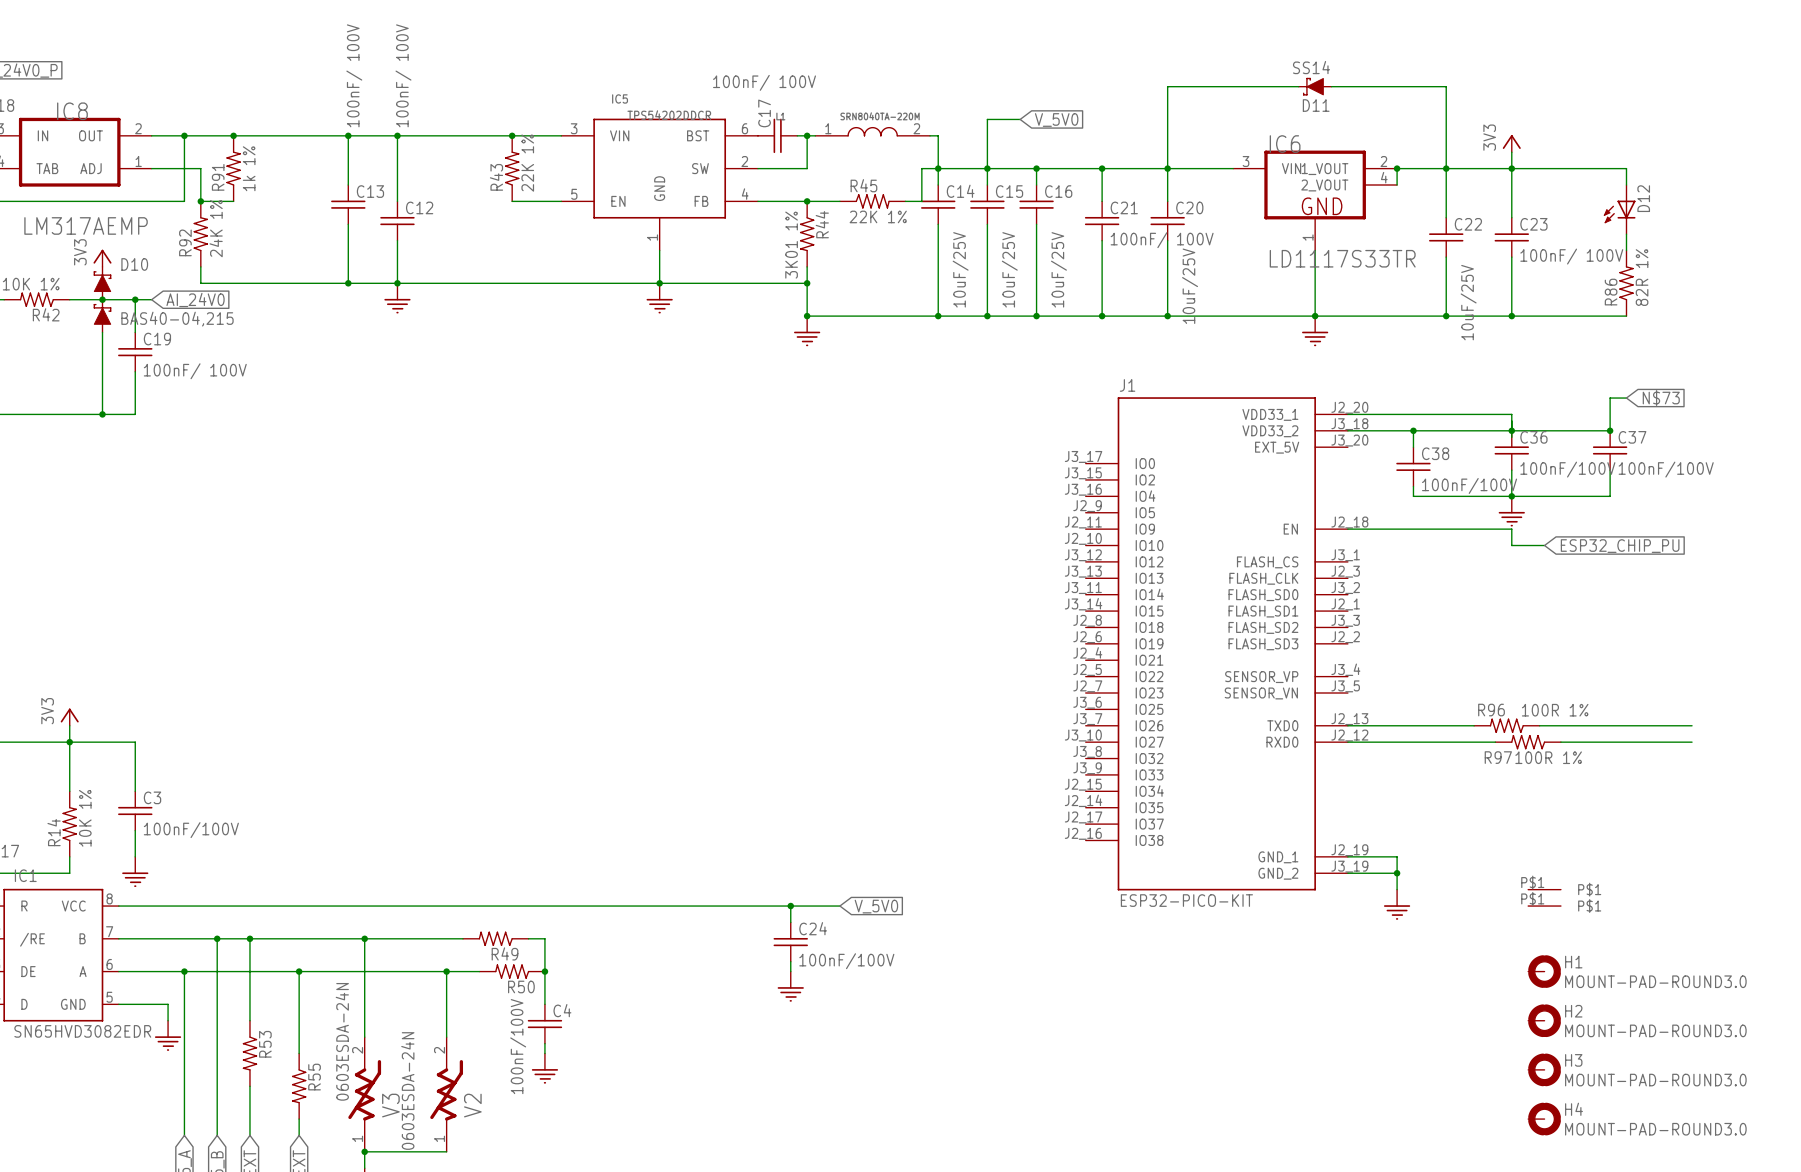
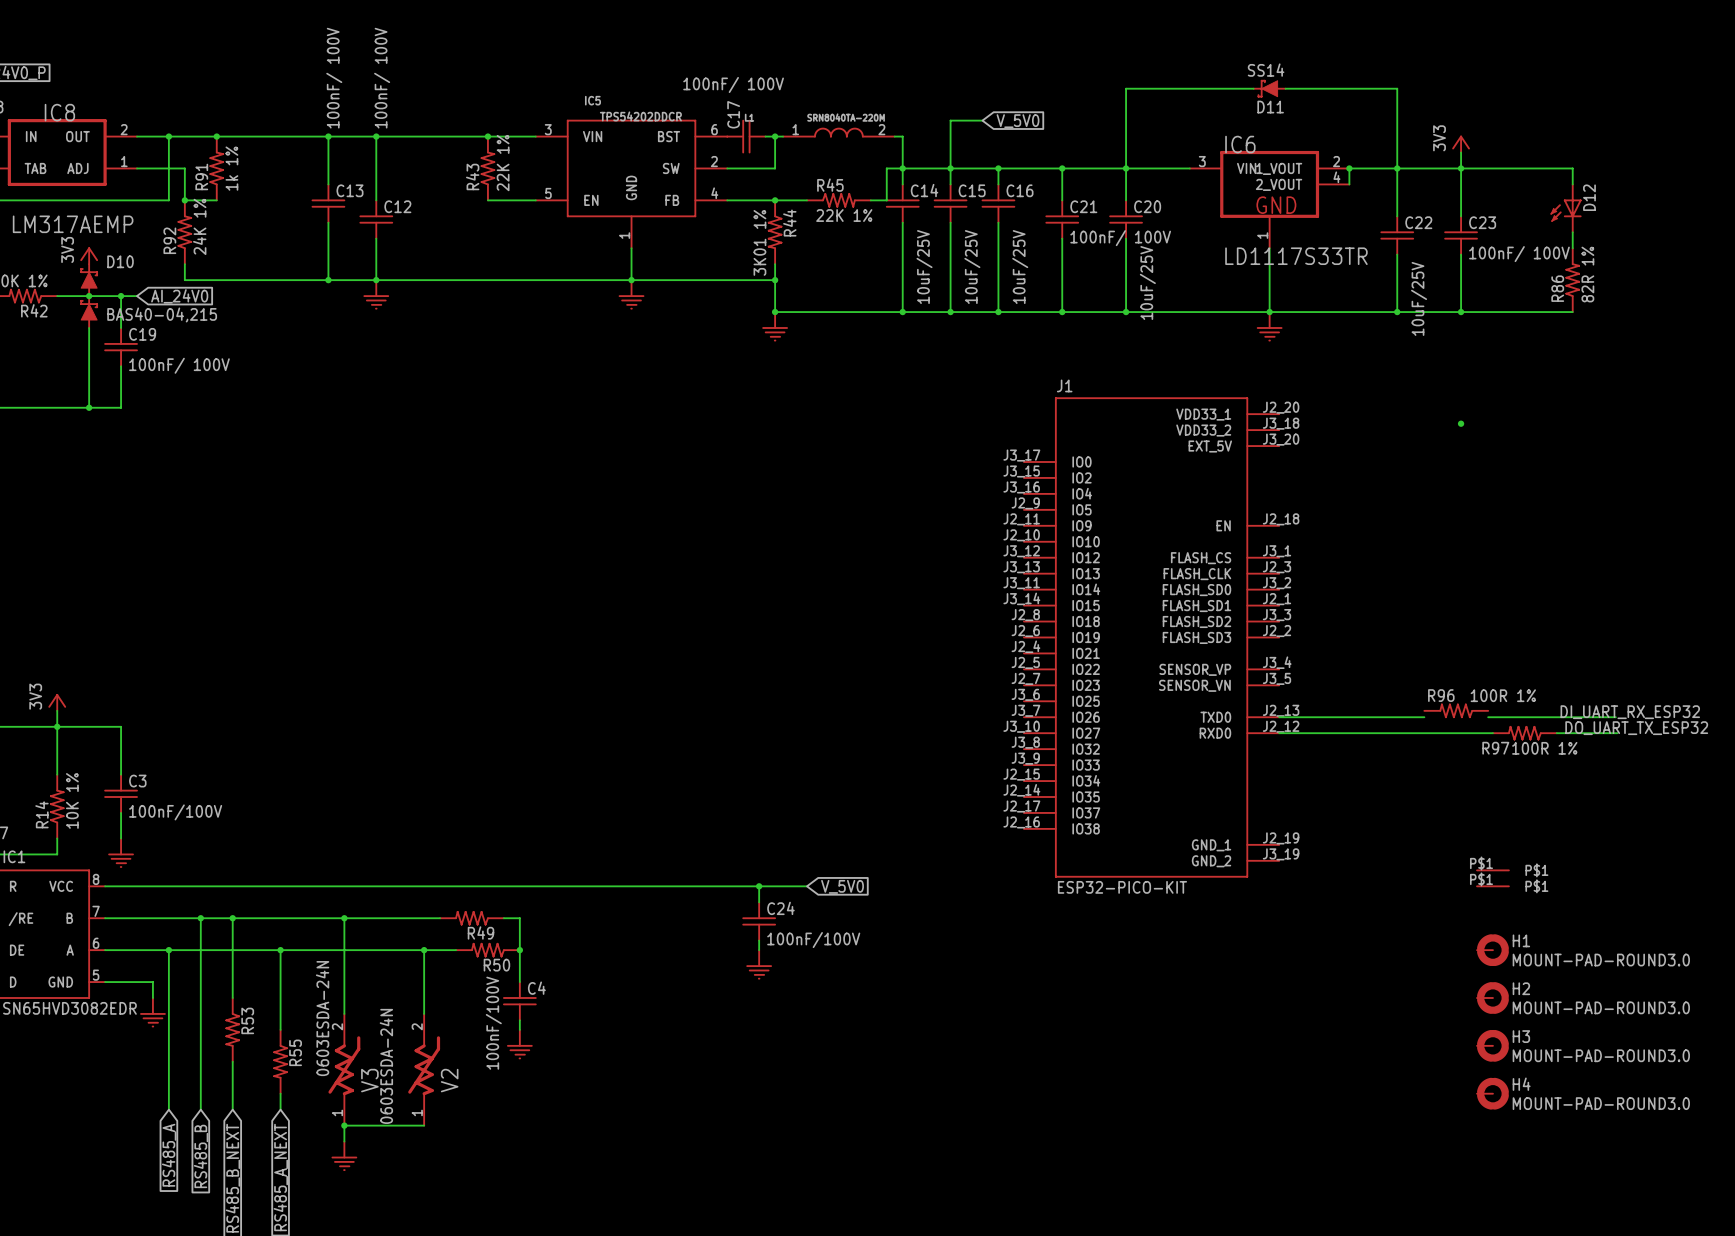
wire: (1626, 398) (1610, 398) (1610, 430) (1347, 430) -> none
global label: N$73 (1661, 398) -> none
wire: (1347, 414) (1511, 414) (1511, 437) -> none
wire: (1413, 430) (1413, 447) -> none
junction: (1413, 430) -> none
junction: (1610, 430) -> none
C36: 100nF/100V (1511, 450) -> none
C37: 100nF/100V (1610, 450) -> none
C38: 100nF/100V (1413, 466) -> none
wire: (1511, 470) (1511, 496) -> none
wire: (1610, 470) (1610, 496) (1413, 496) (1413, 486) -> none
junction: (1511, 496) -> none
power symbol: (1511, 511) -> none
wire: (1347, 529) (1511, 529) (1511, 545) (1544, 545) -> none
global label: ESP32_CHIP_PU (1620, 546) -> none
J1 position: (1216, 643) -> (1151, 637)
wire: (1347, 725) (1474, 725) -> none
wire: (1539, 725) (1692, 725) -> none
label: none -> DI_UART_RX_ESP32 (1630, 712)
wire: none -> (1279, 717) (1424, 717)
wire: (1347, 742) (1495, 742) -> none
R97 position: (1528, 742) -> (1524, 733)
wire: (1560, 742) (1692, 742) -> (1488, 717) (1615, 717)
label: none -> DO_UART_TX_ESP32 (1636, 728)
wire: none -> (1279, 733) (1492, 733)
wire: none -> (1556, 733) (1617, 733)
wire: (1347, 856) (1397, 856) (1397, 889) -> none
wire: (1347, 873) (1397, 873) -> none
junction: (1397, 873) -> none
power symbol: (1397, 904) -> none

